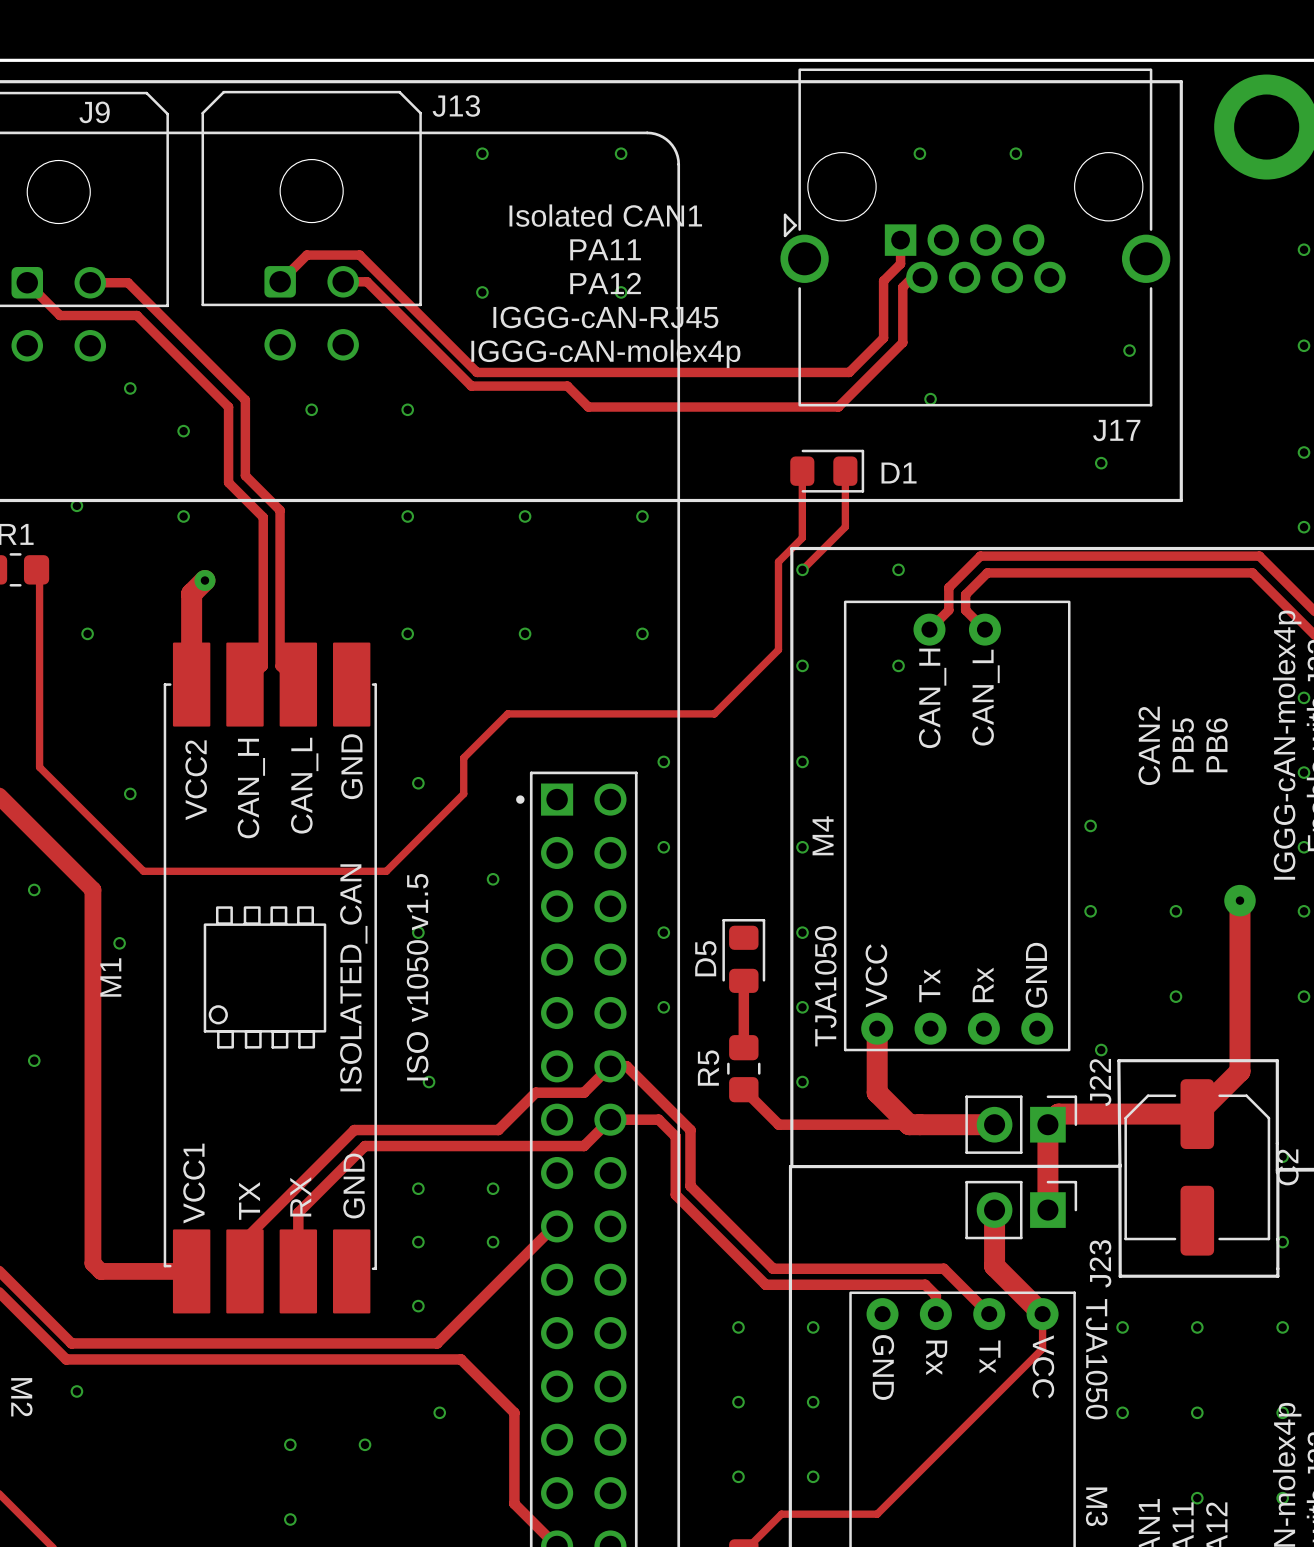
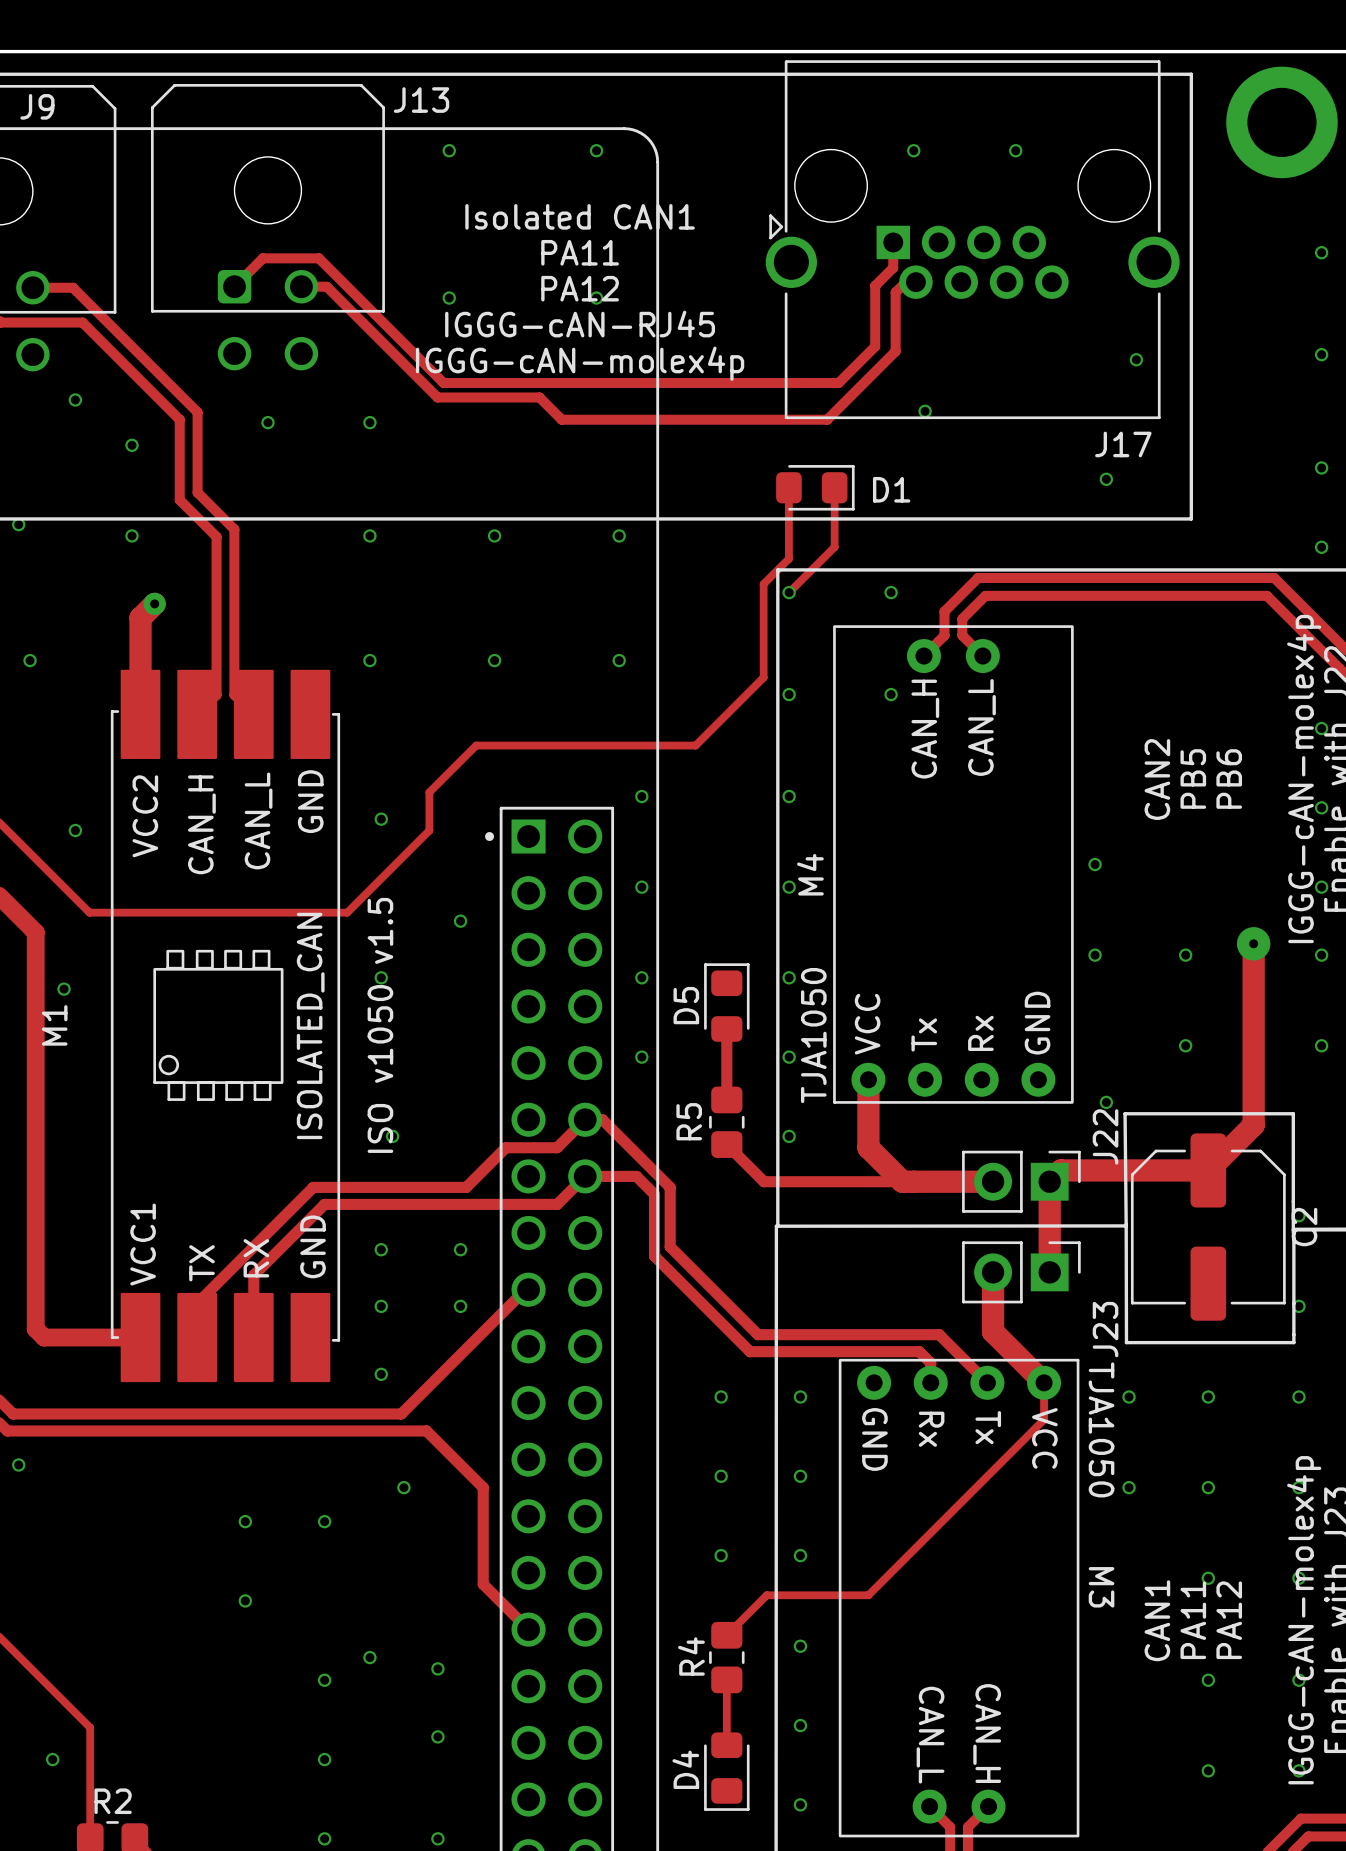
M1 footprint: [163, 642, 377, 1314] -> [110, 669, 341, 1383]

